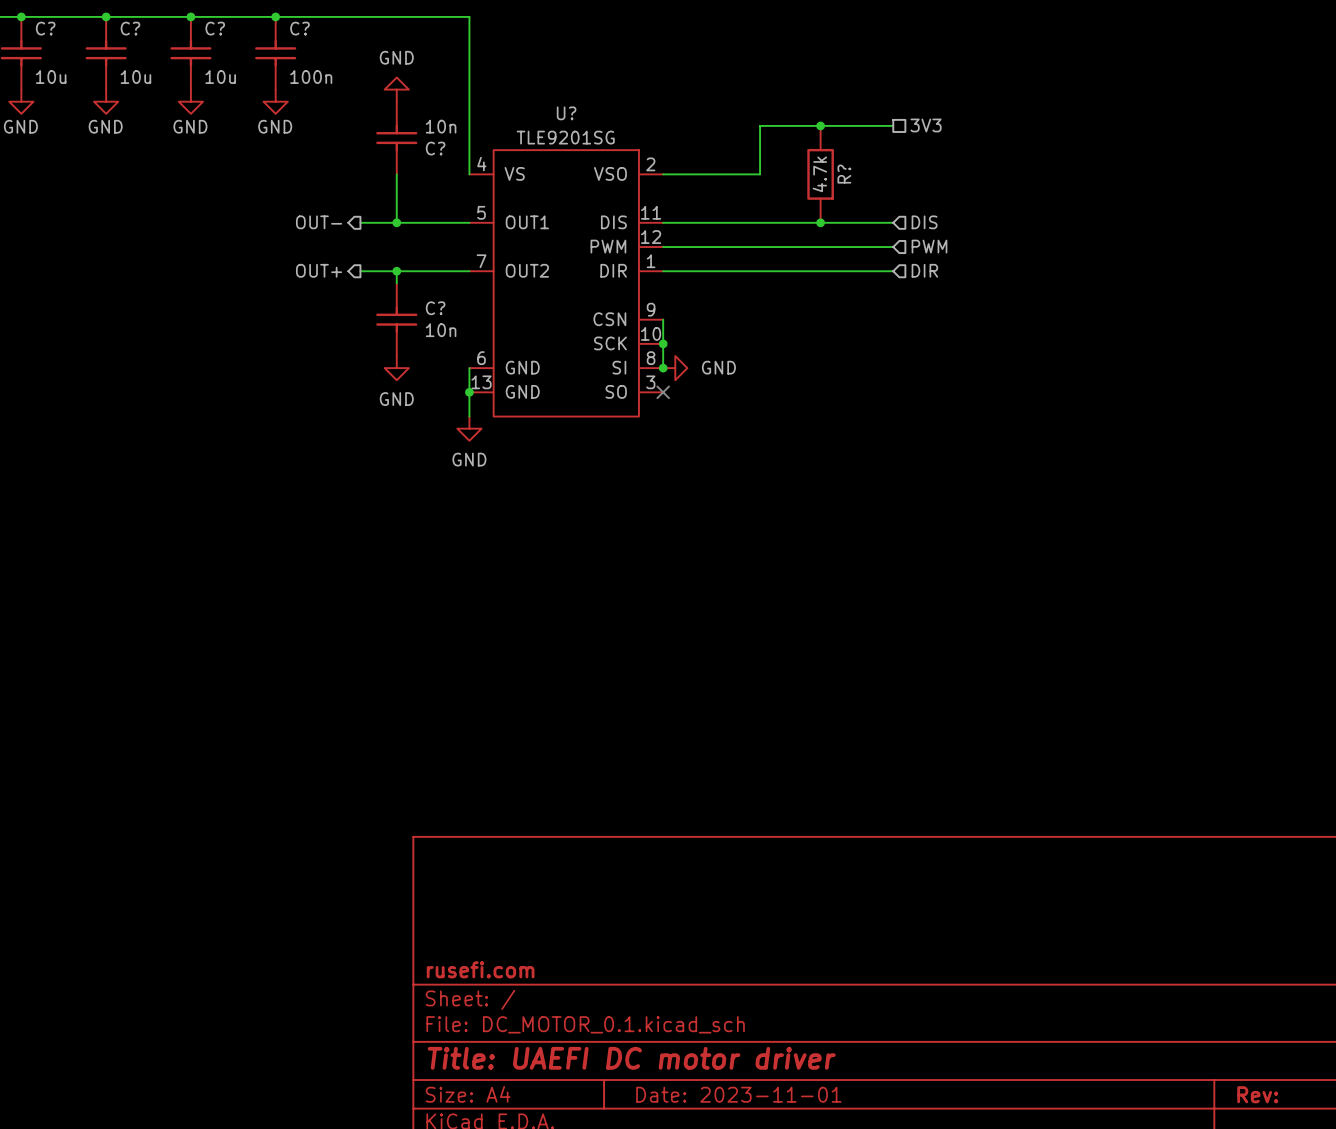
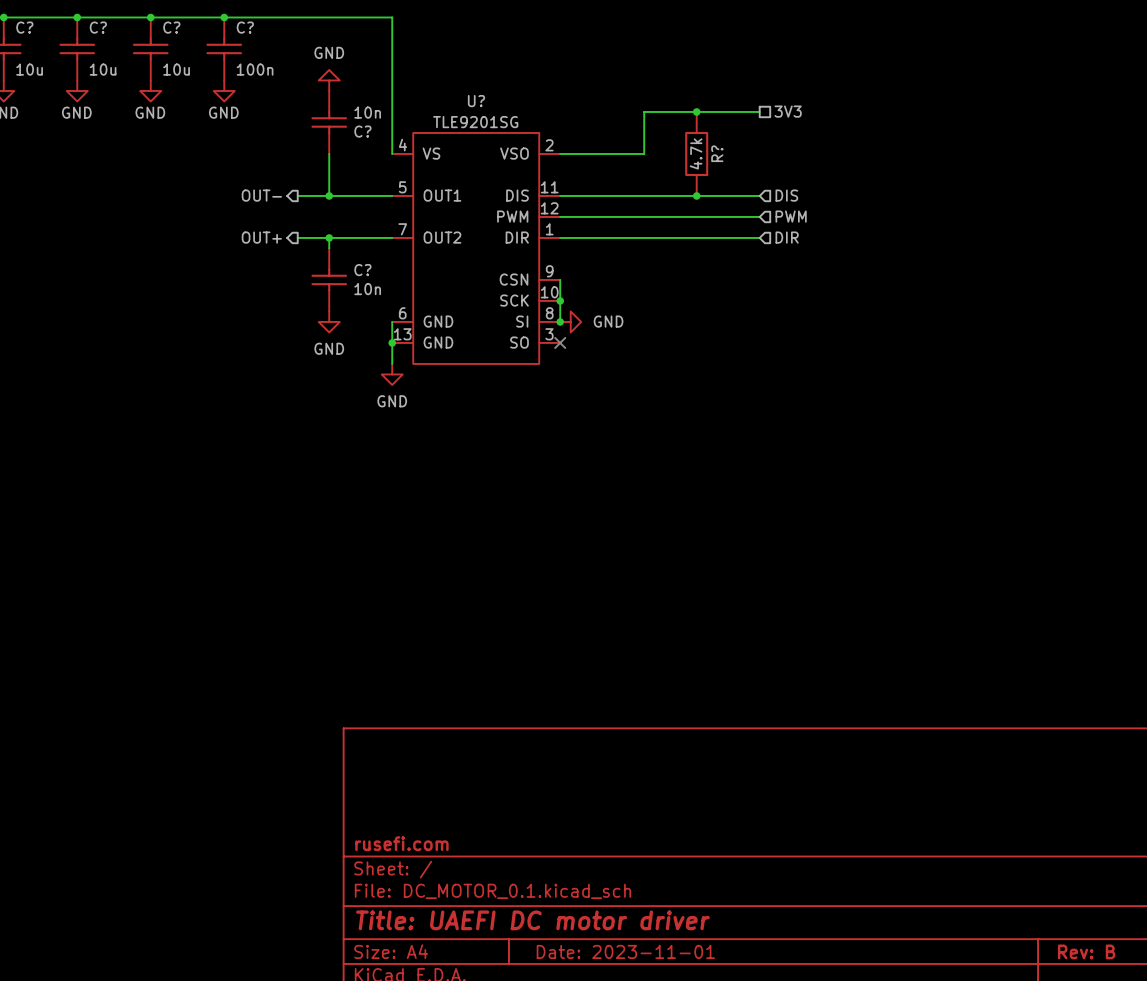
title block: Rev: (1257, 1094) -> Rev: B (1086, 951)

